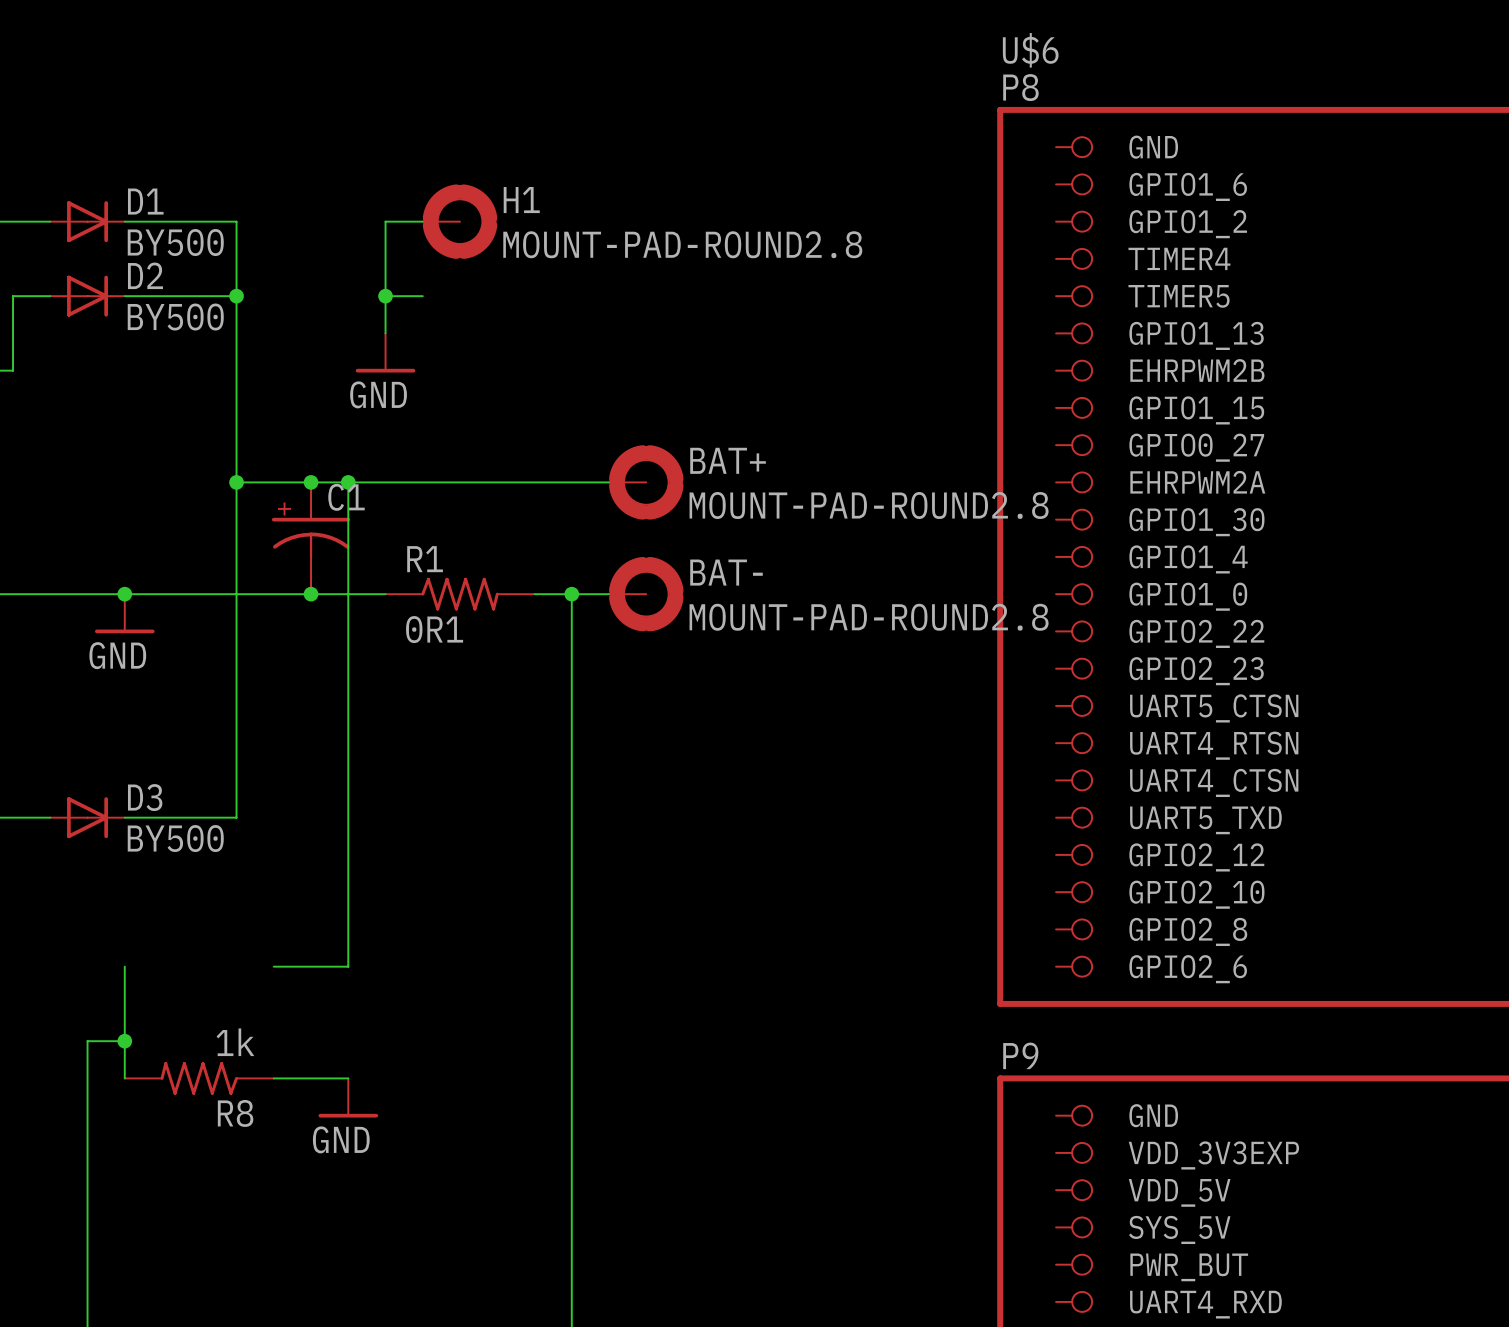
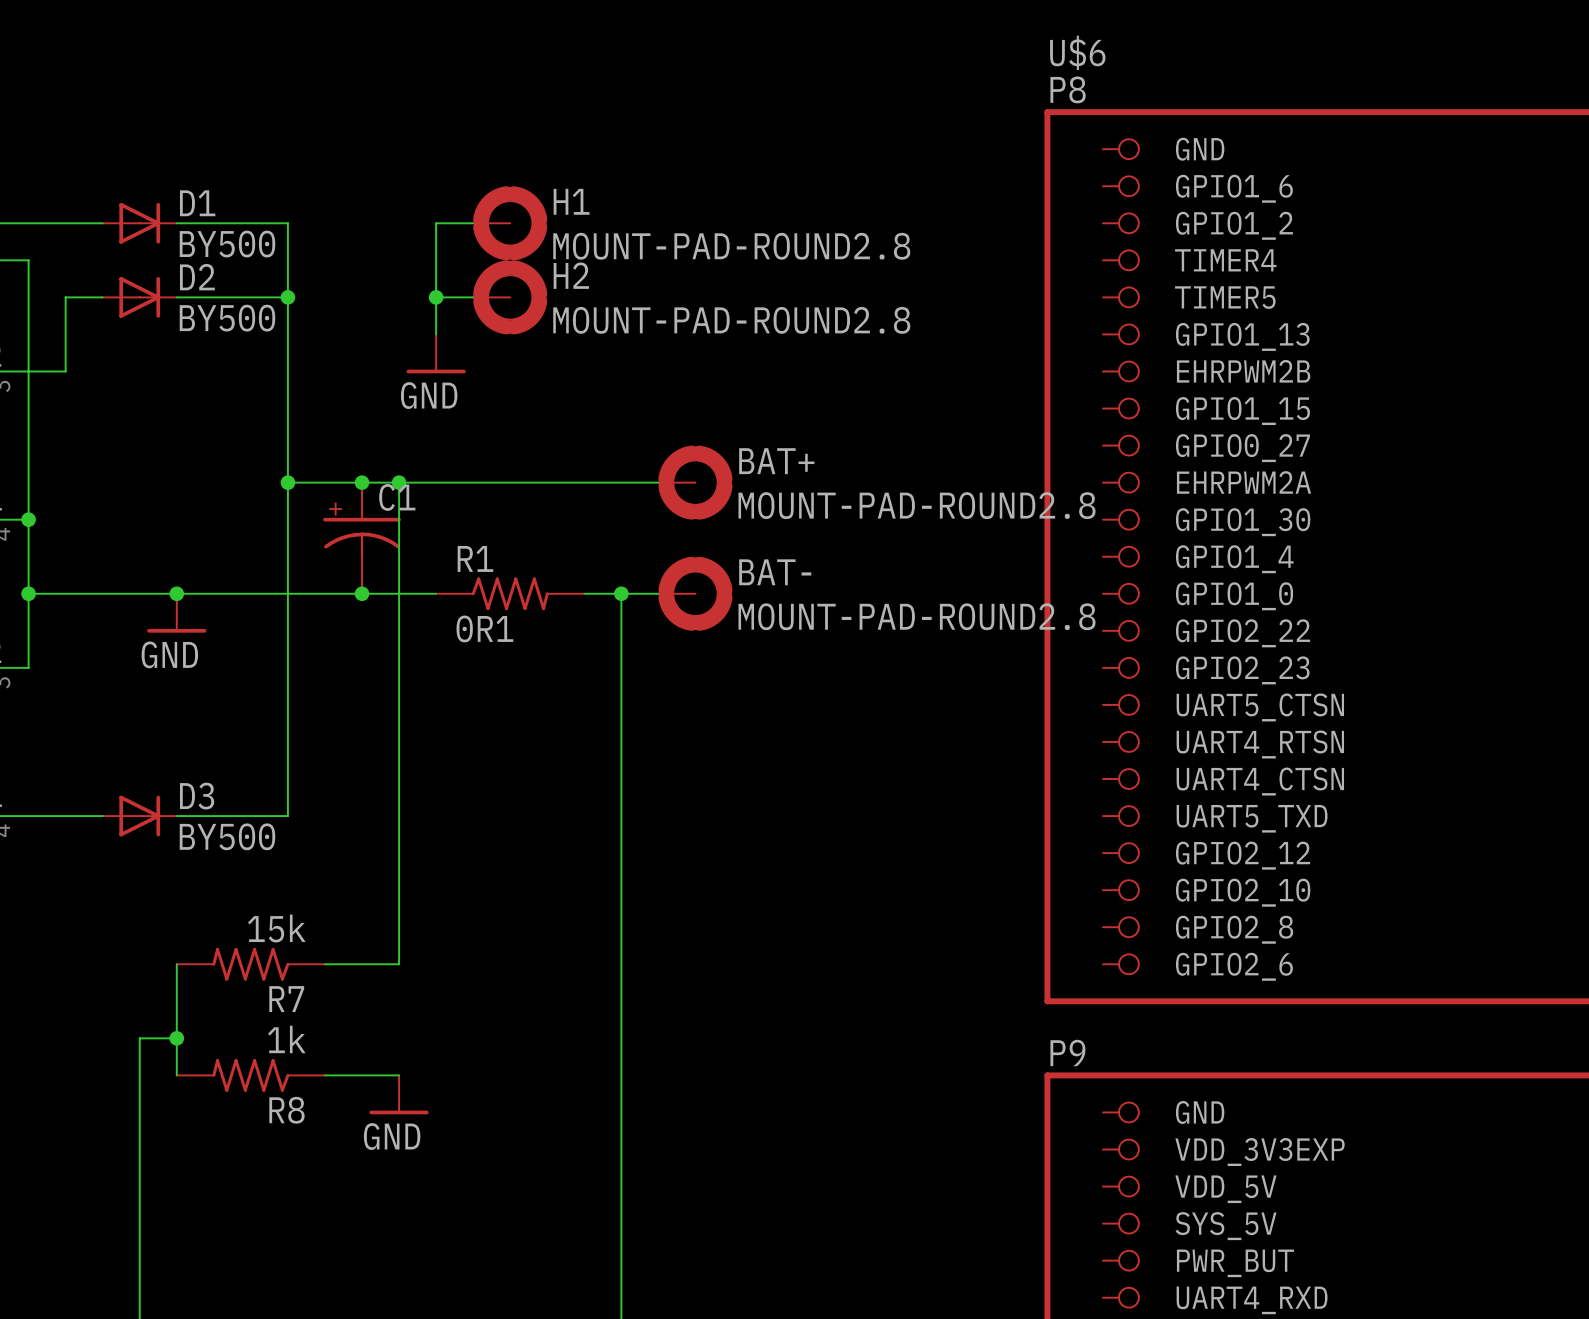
H2: none -> MOUNT-PAD-ROUND2.8 (510, 297)
R7: none -> 15k (250, 964)

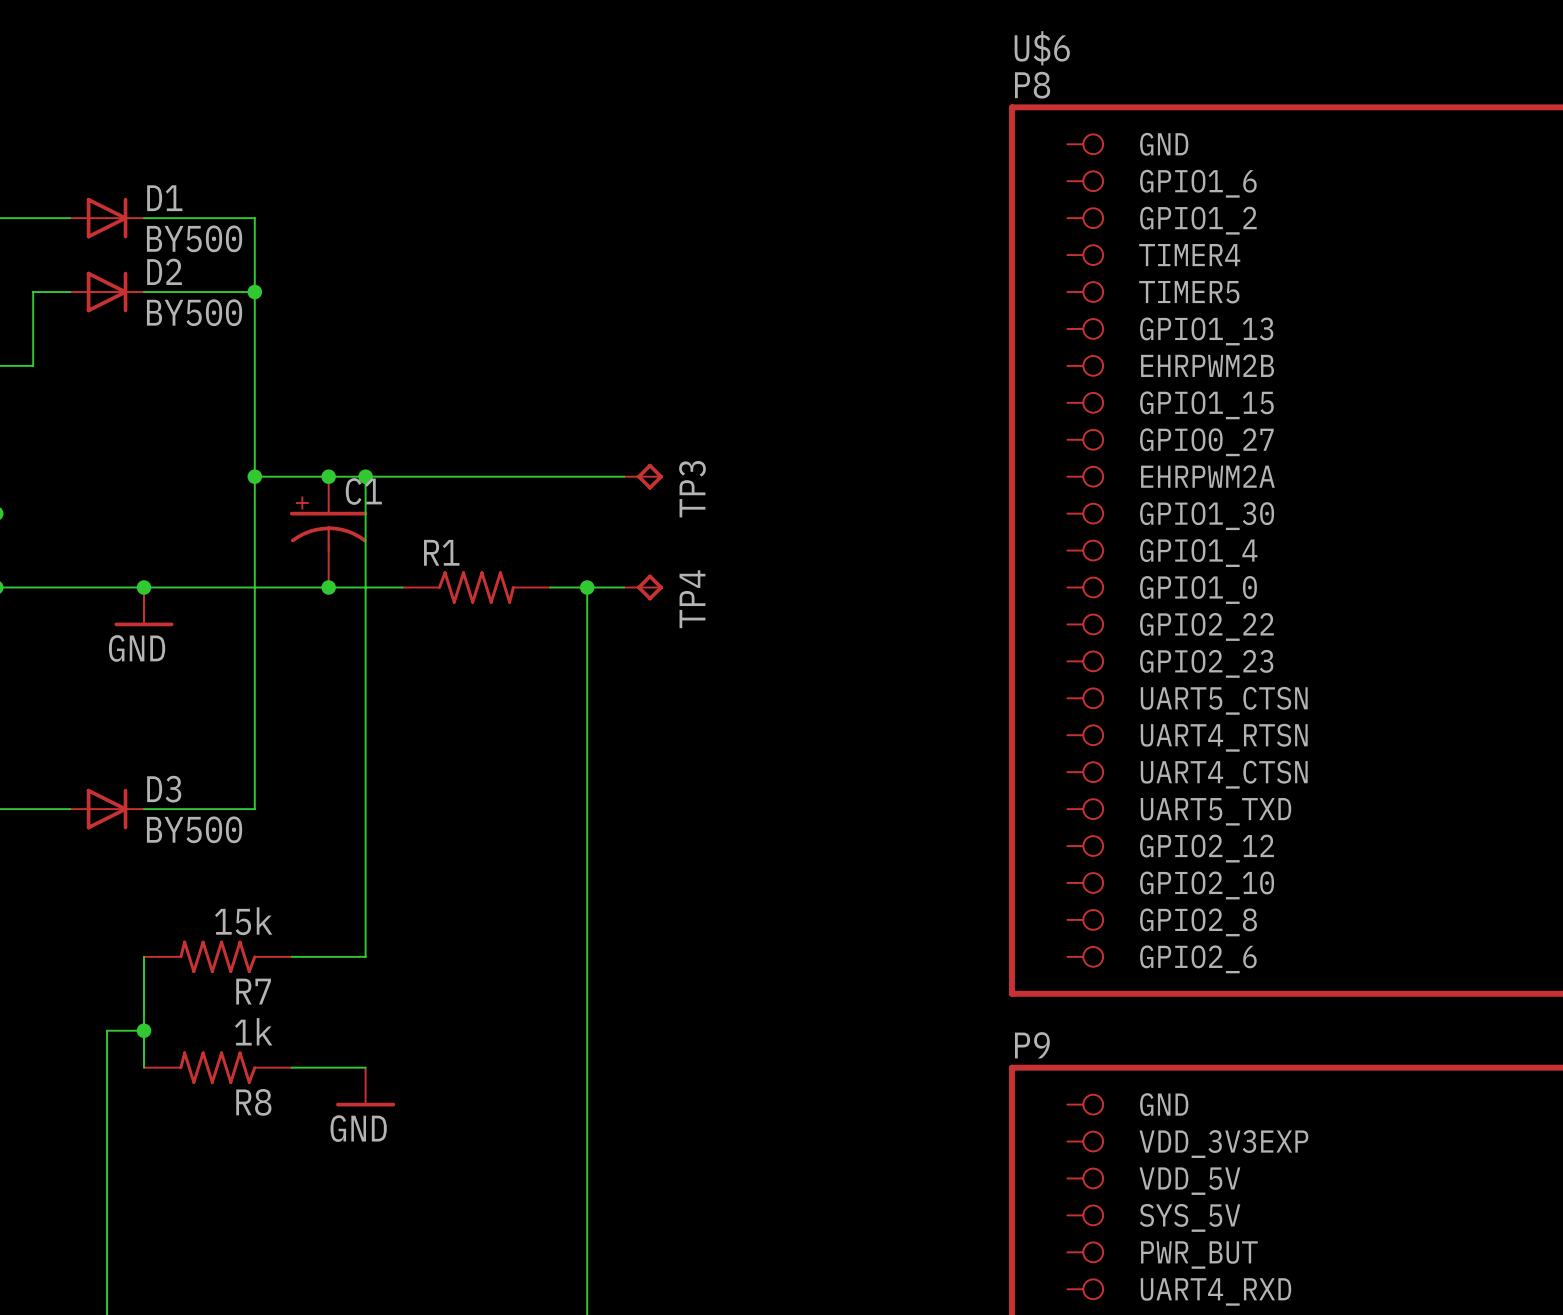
wire: (473, 223) (436, 223) (436, 334) -> none
H1: MOUNT-PAD-ROUND2.8 (510, 223) -> none
wire: (436, 297) (473, 297) -> none
junction: (436, 297) -> none
H2: MOUNT-PAD-ROUND2.8 (510, 297) -> none
power symbol: GND (436, 353) -> none
TP3: none -> (643, 476)
BAT+: MOUNT-PAD-ROUND2.8 (695, 482) -> none
TP4: none -> (643, 587)
BAT-: MOUNT-PAD-ROUND2.8 (695, 593) -> none
R1 value: 0R1 (484, 628) -> none

